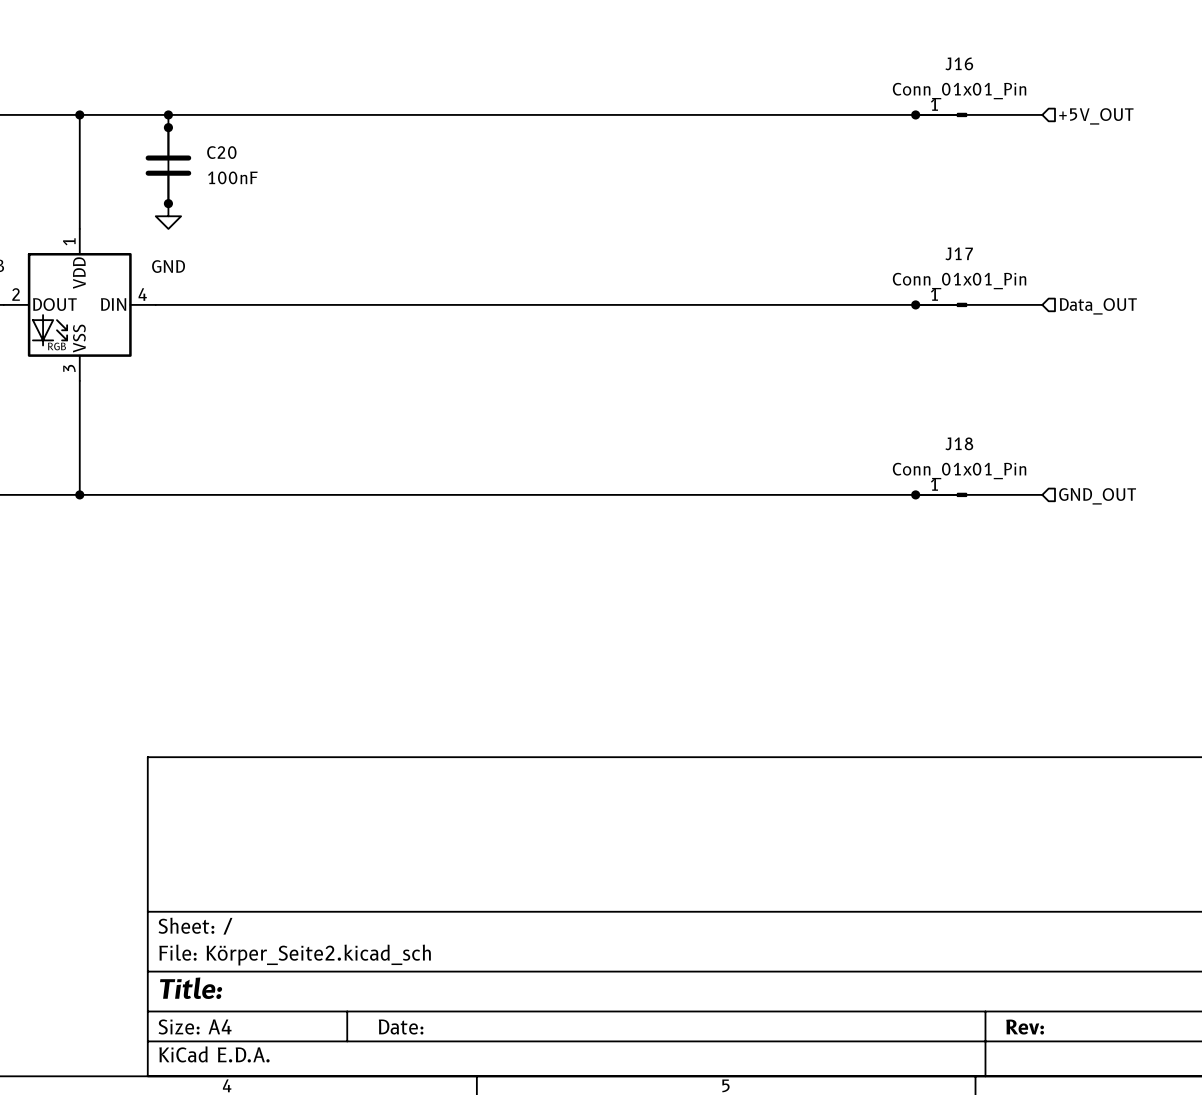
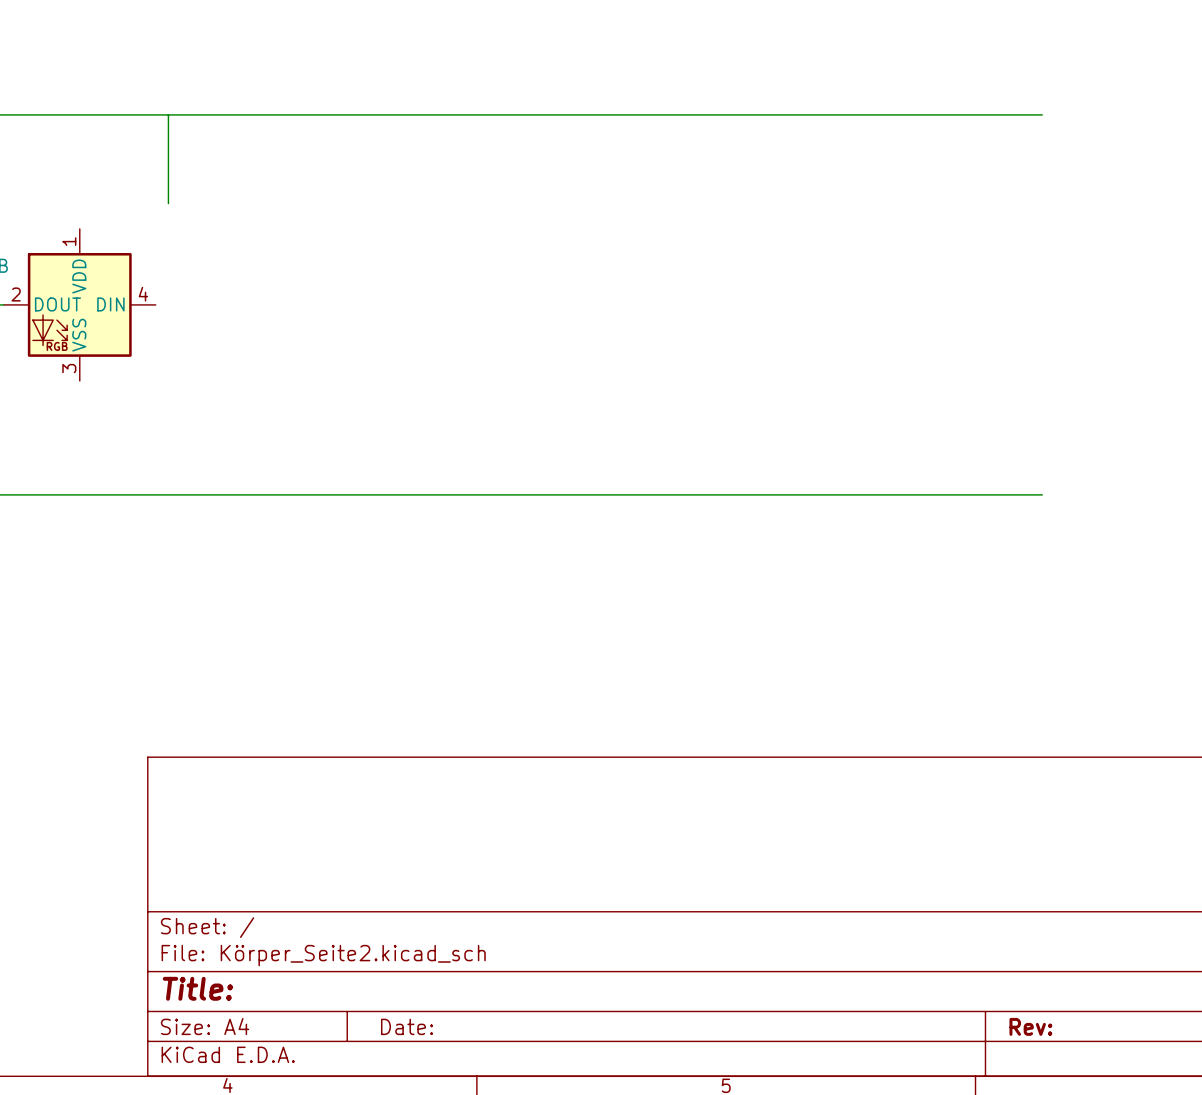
wire: (79, 114) (79, 228) -> none
junction: (79, 114) -> none
junction: (168, 114) -> none
junction: (915, 114) -> none
J16: Conn_01x01_Pin (941, 114) -> none
hierarchical label: +5V_OUT (1096, 116) -> none
junction: (168, 127) -> none
C20: 100nF (168, 165) -> none
junction: (168, 203) -> none
power symbol: GND (168, 216) -> none
wire: (155, 304) (1042, 304) -> none
junction: (915, 304) -> none
J17: Conn_01x01_Pin (941, 304) -> none
hierarchical label: Data_OUT (1098, 306) -> none
wire: (79, 380) (79, 494) -> none
junction: (79, 494) -> none
junction: (915, 494) -> none
J18: Conn_01x01_Pin (941, 494) -> none
hierarchical label: GND_OUT (1097, 496) -> none

